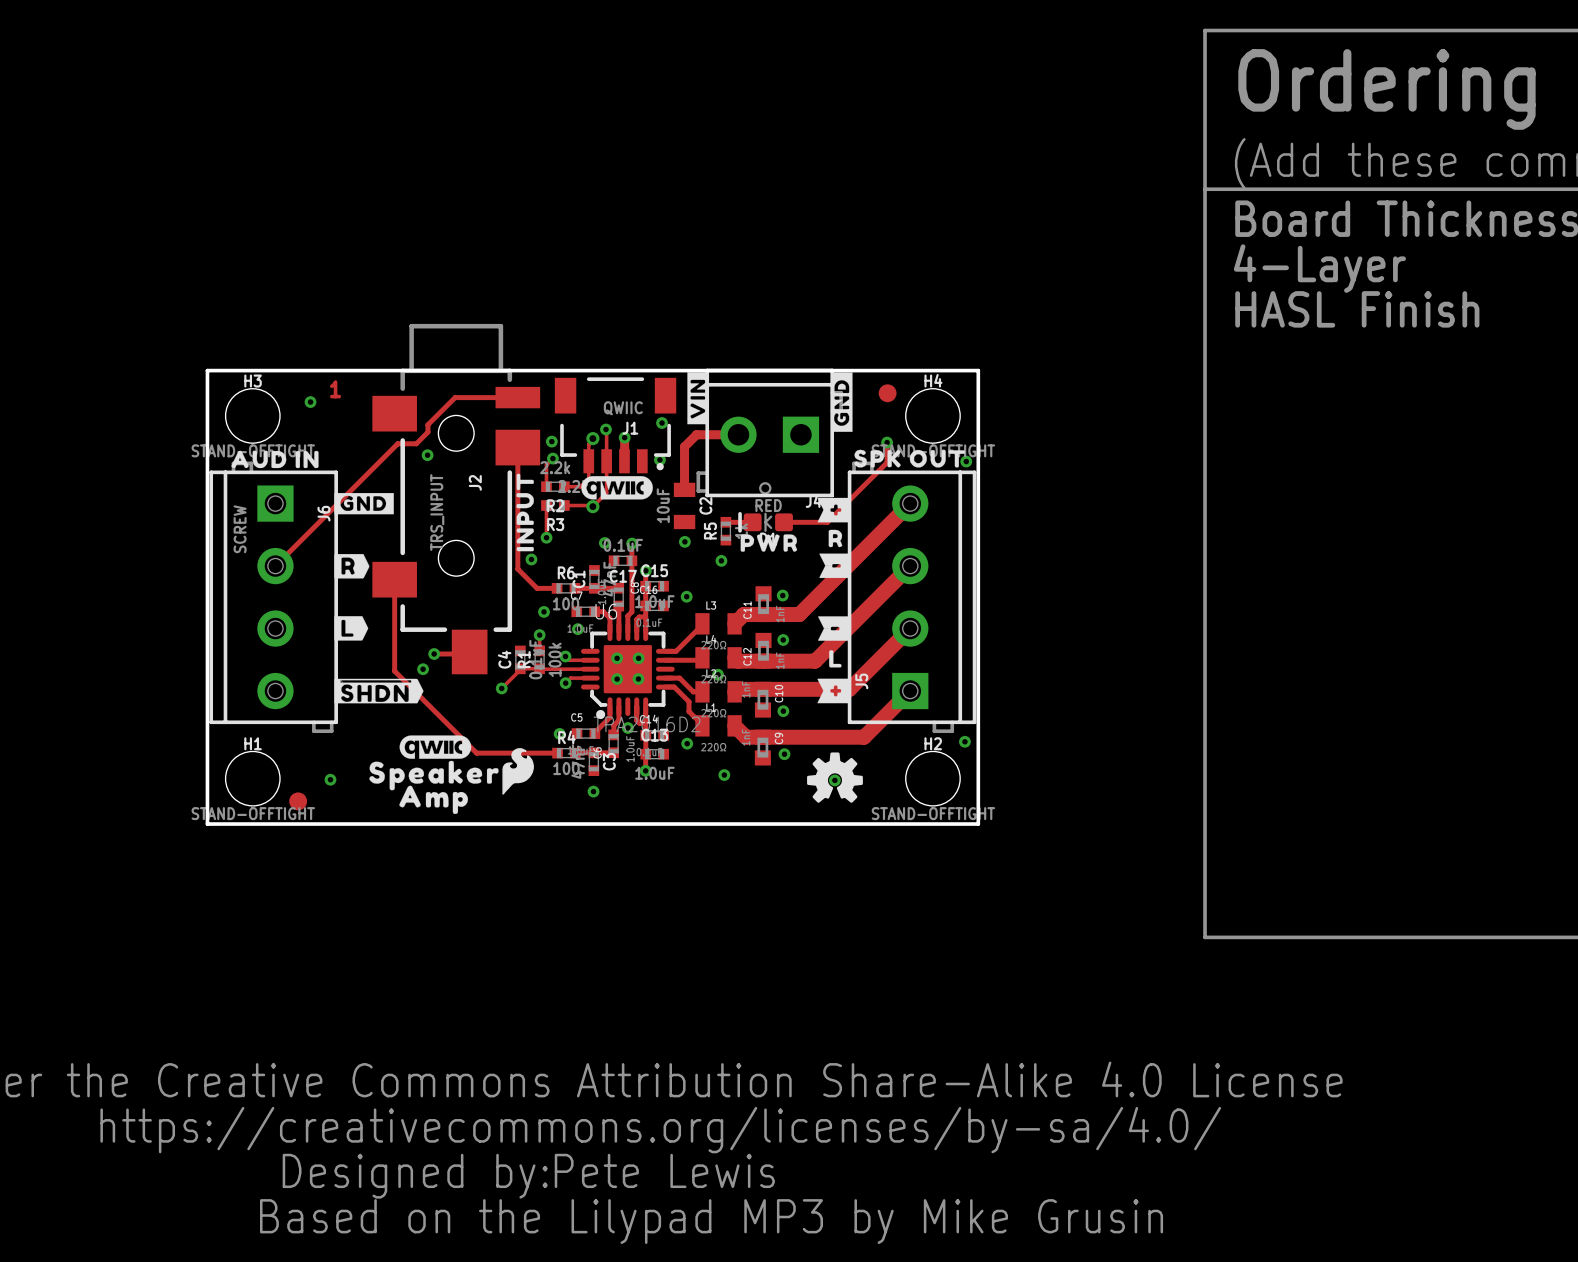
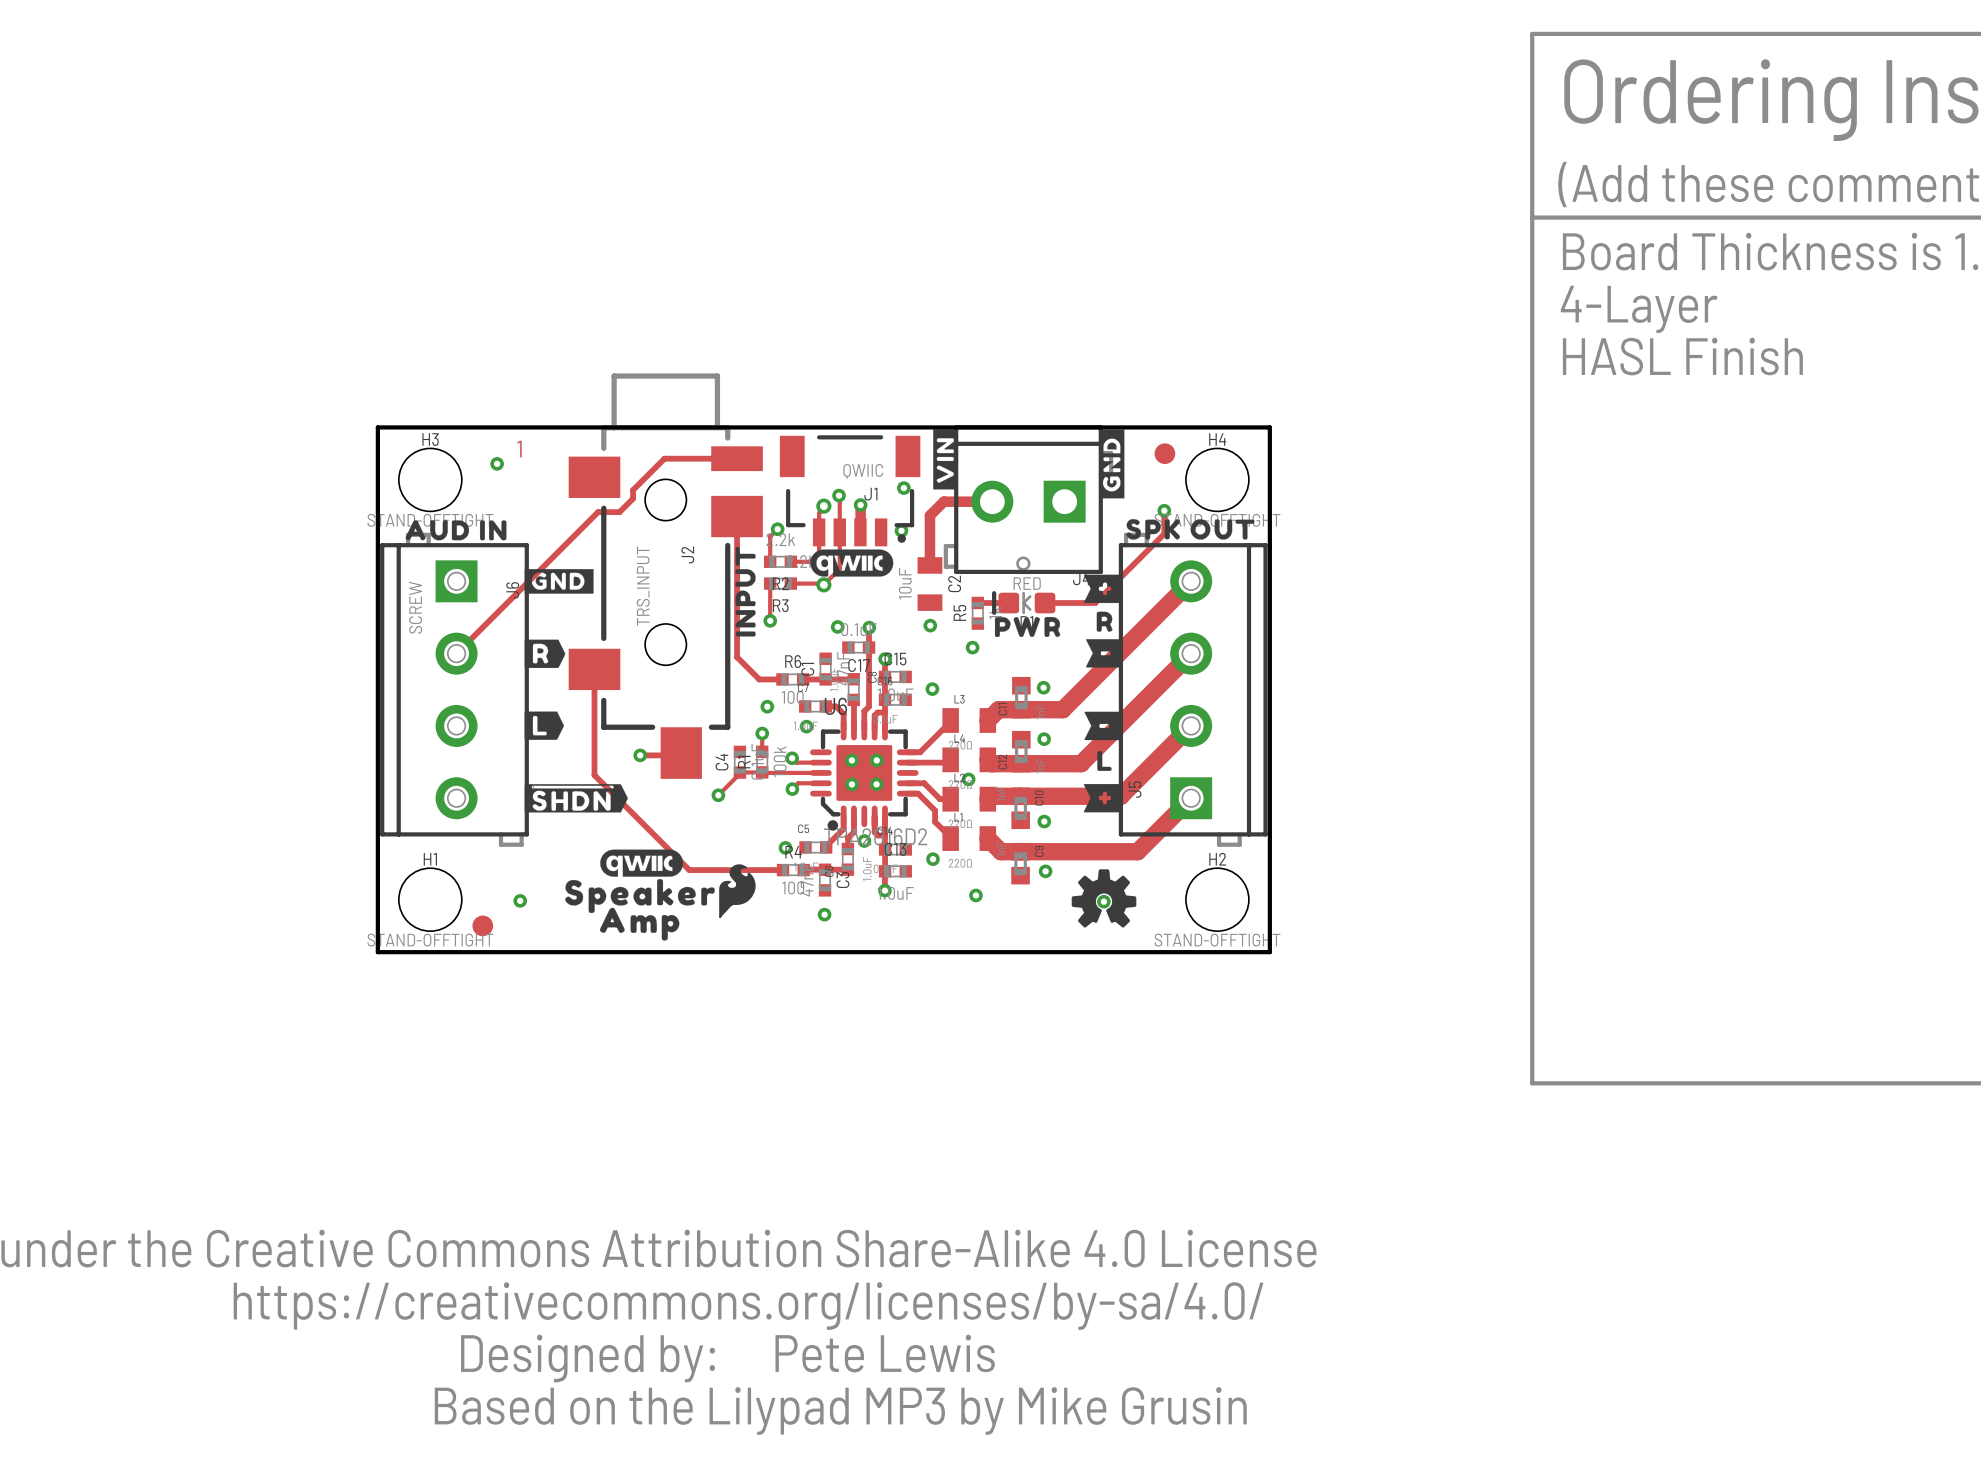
via: (551, 441) -> none
via: (427, 455) -> none
via: (966, 461) -> none
via: (531, 559) -> none
via: (423, 669) -> none
via: (964, 741) -> none

